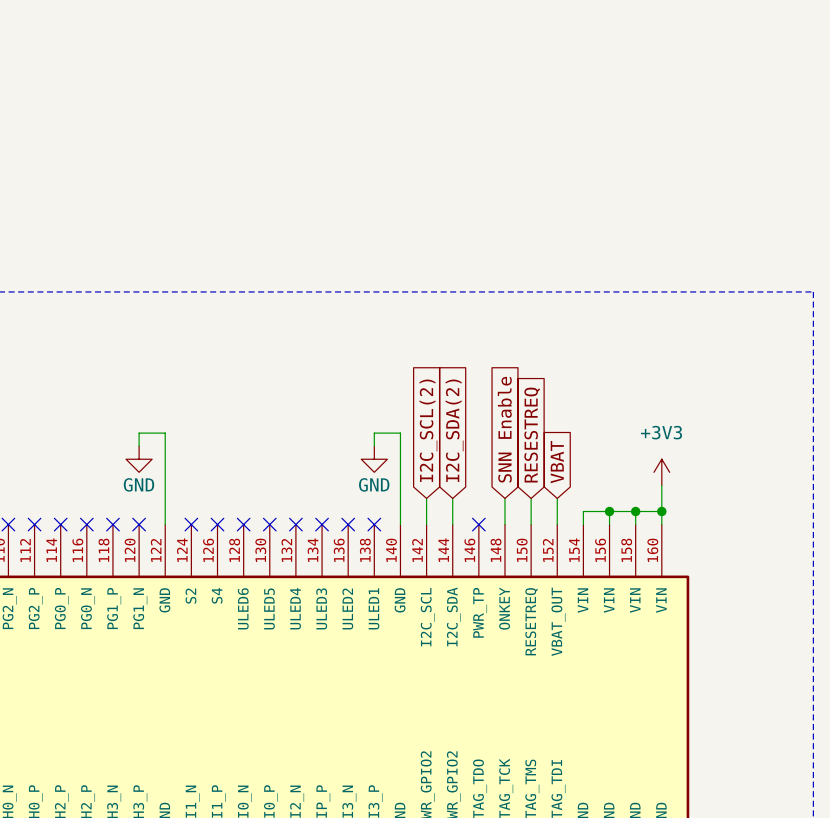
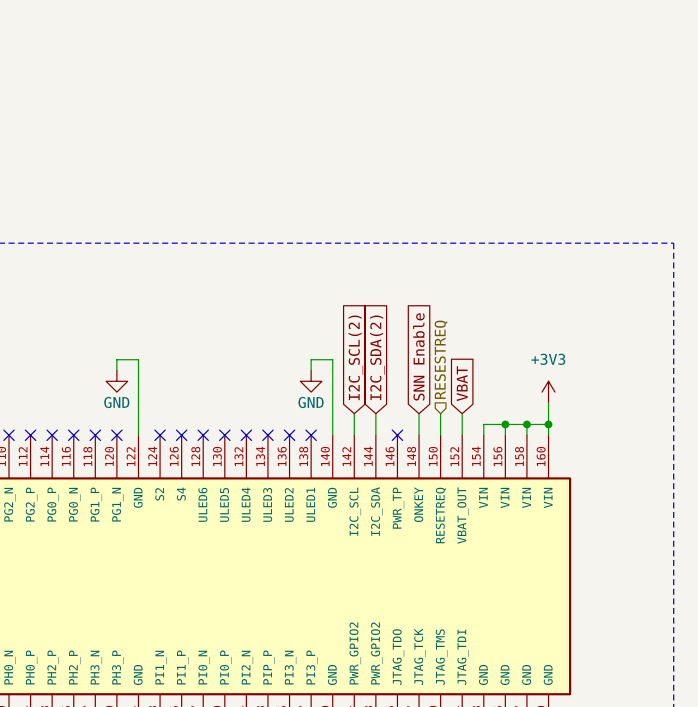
hierarchical label: none -> RESESTREQ (441, 359)
global label: RESESTREQ (532, 435) -> none

